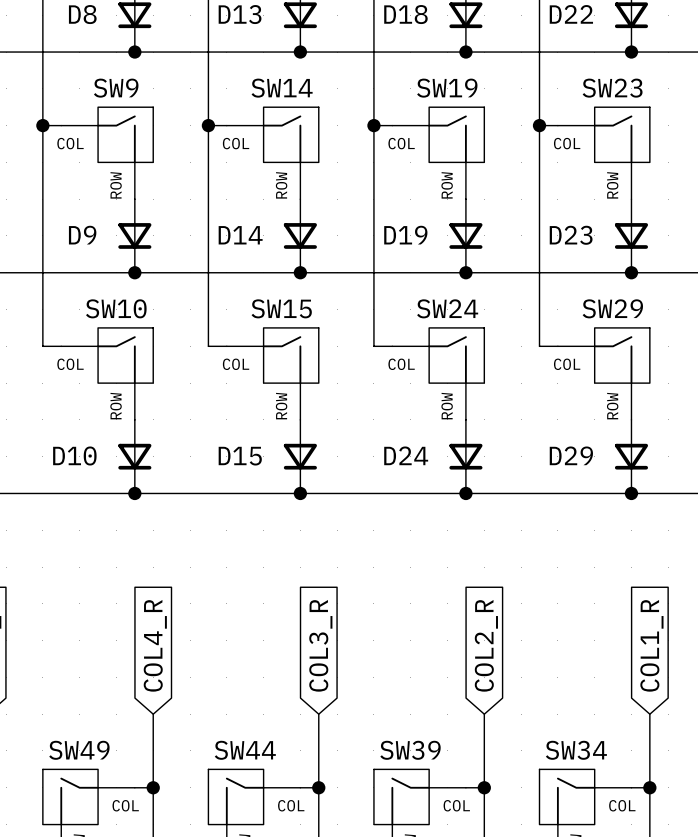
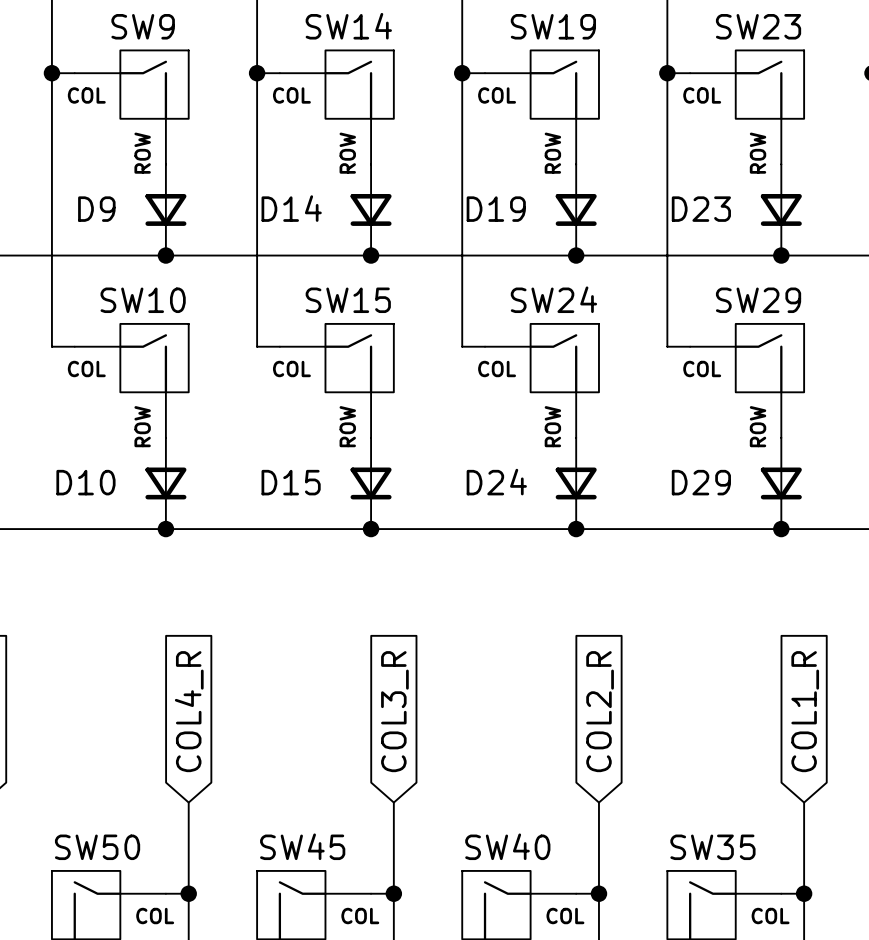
SW49 name: SW49 (79, 750) -> SW50 (97, 847)
SW44 name: SW44 (245, 750) -> SW45 (302, 846)
SW39 name: SW39 (410, 750) -> SW40 (507, 846)
SW34 name: SW34 (576, 750) -> SW35 (712, 847)

